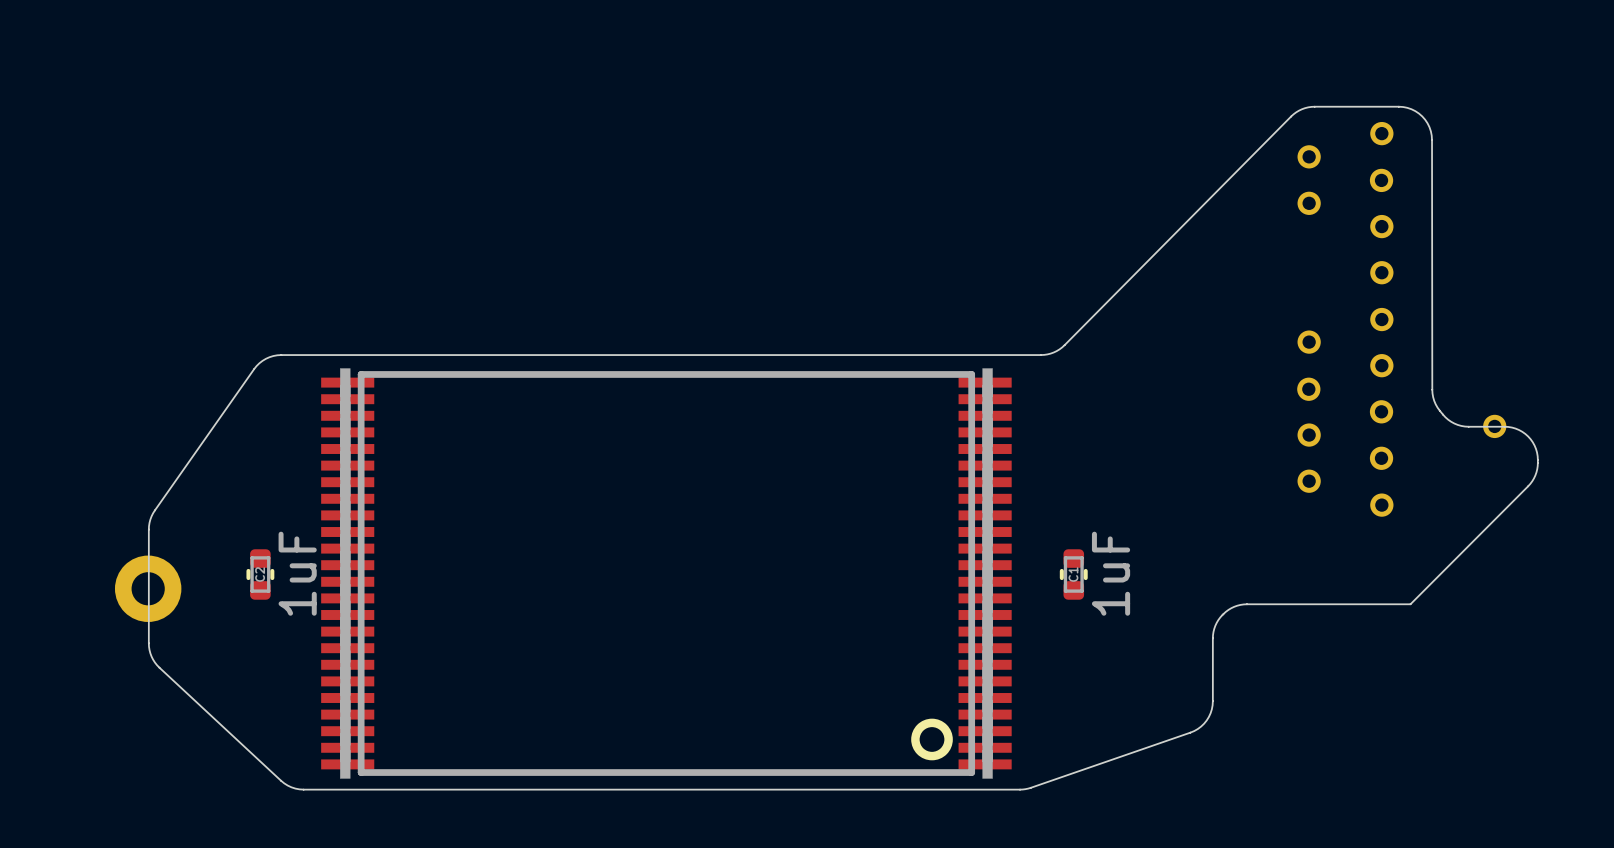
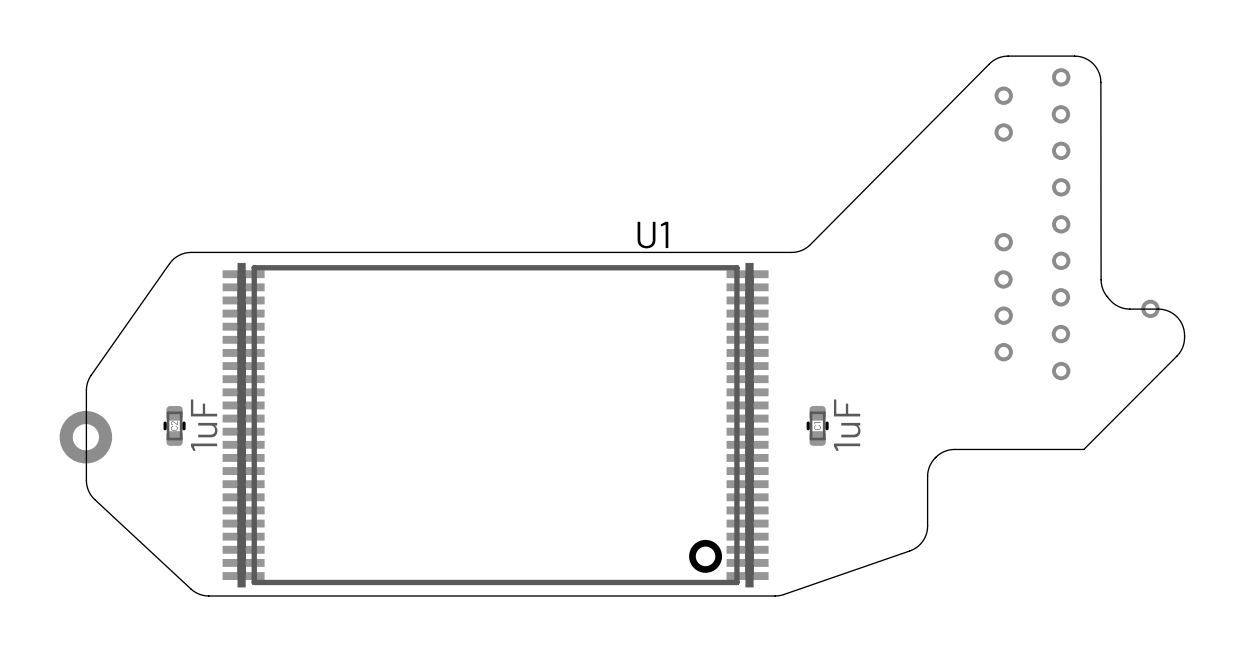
U1 name: none -> U1 (652, 235)

